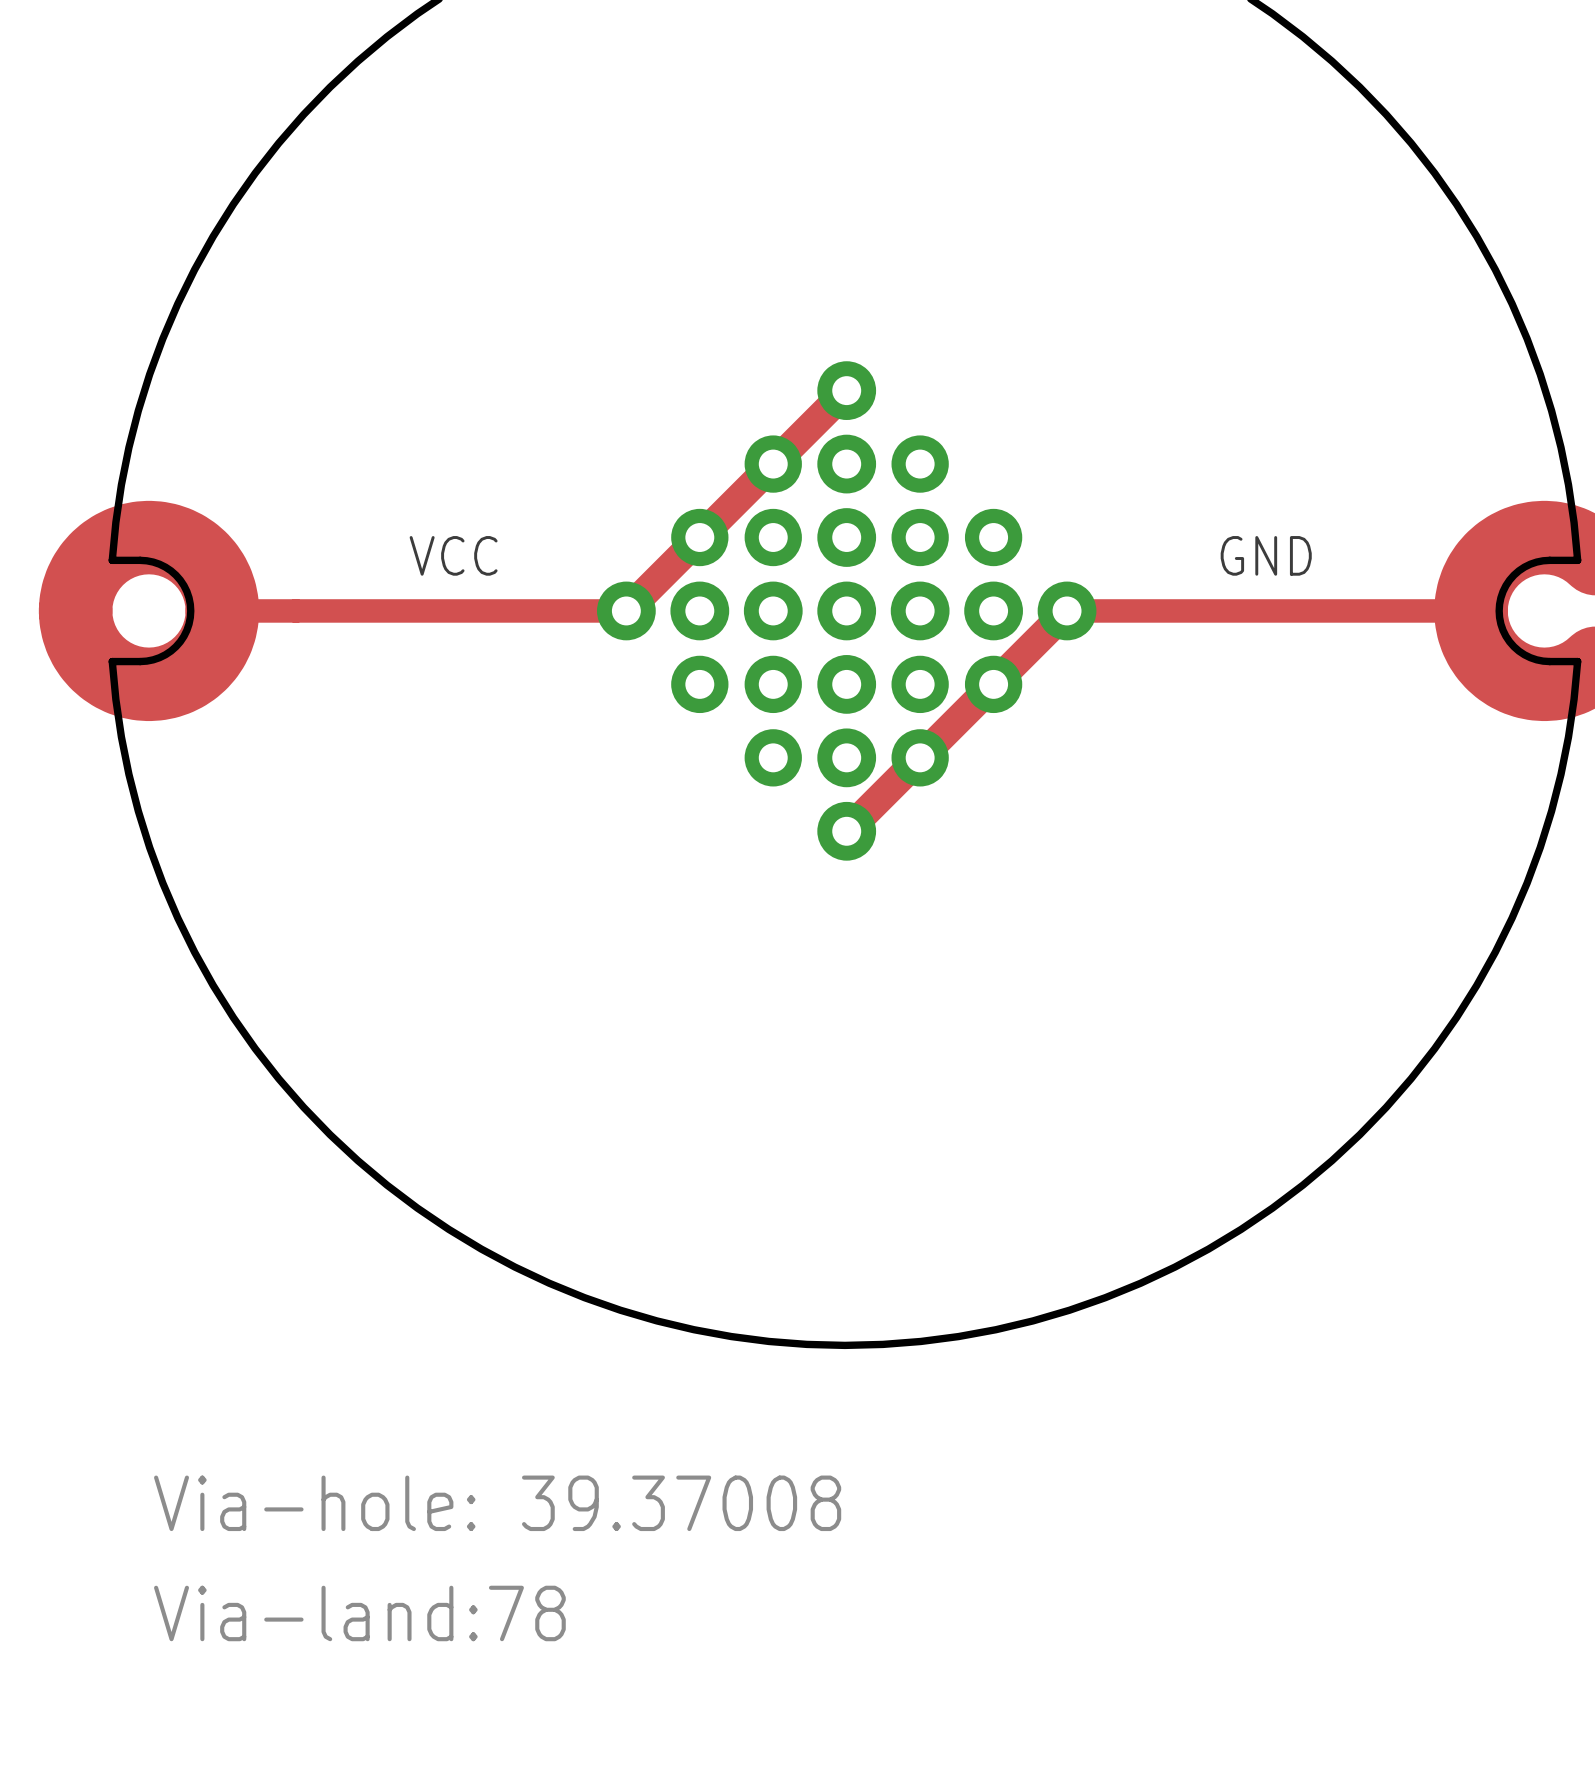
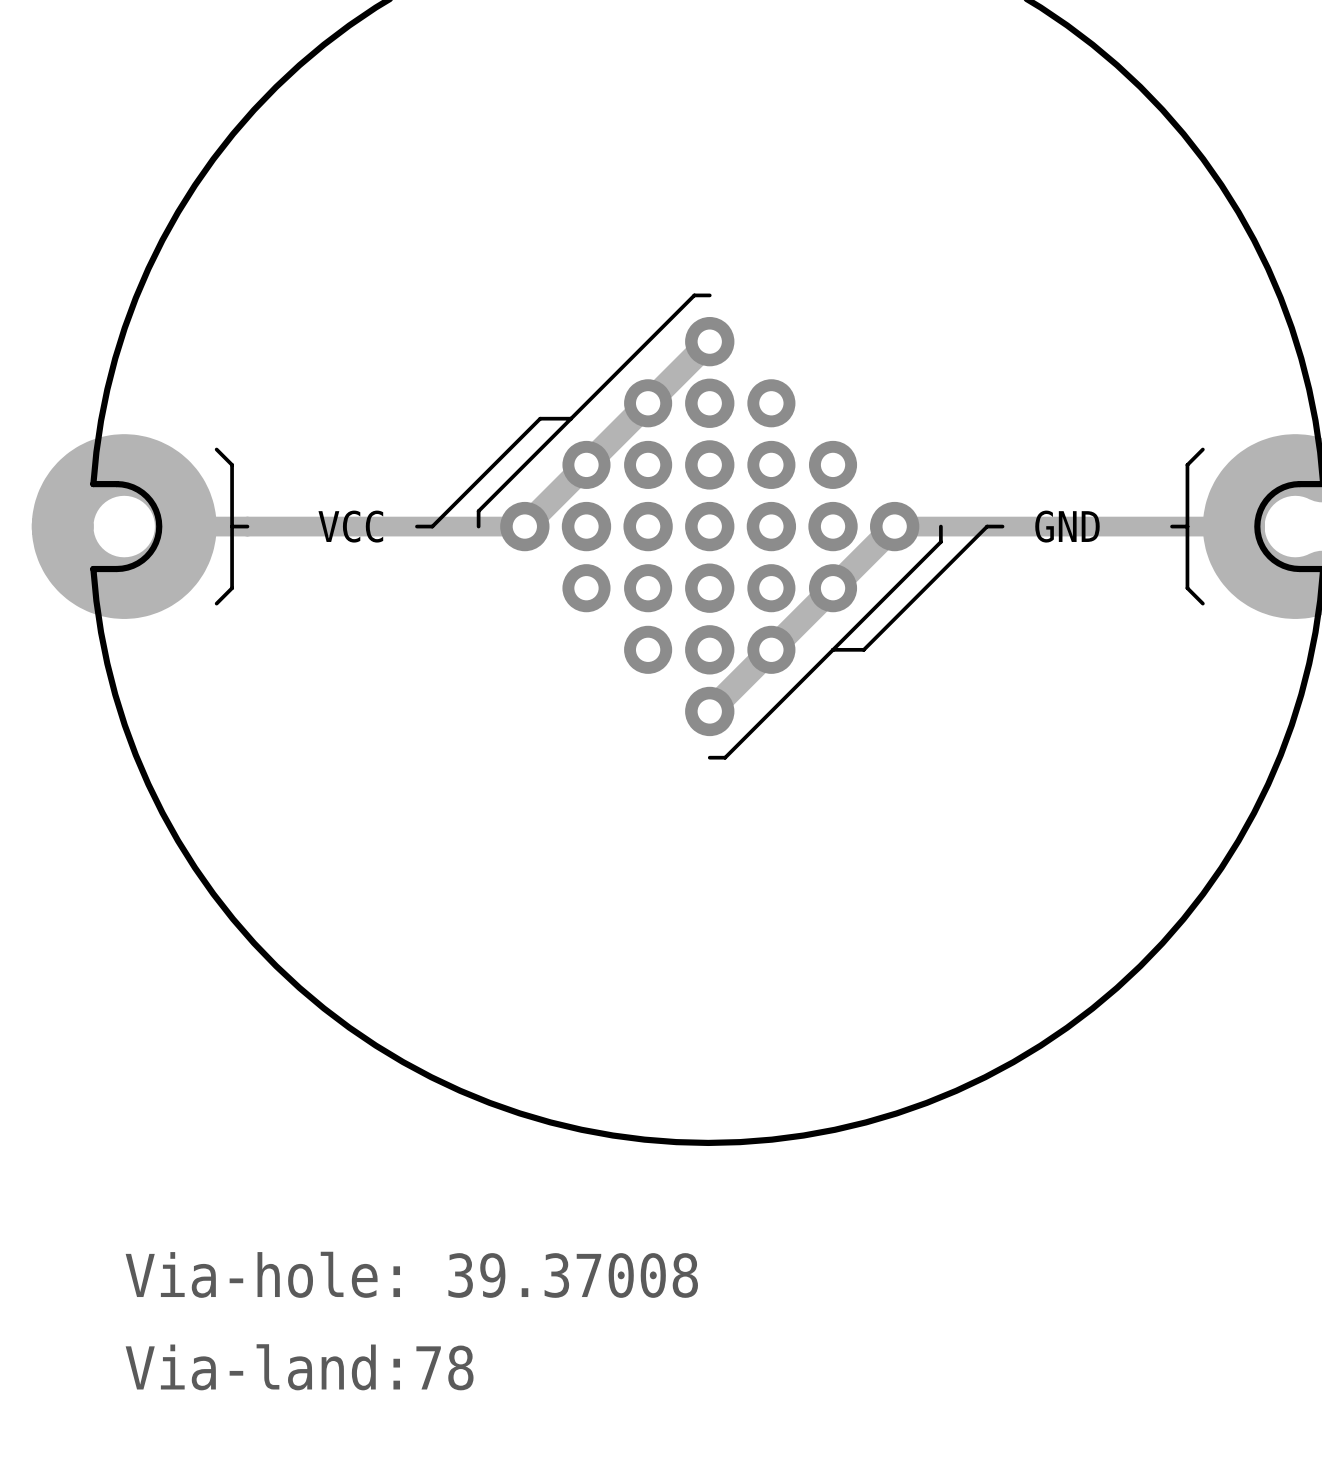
line: none -> (709, 295) (694, 295) (478, 511) (478, 526)
line: none -> (571, 418) (540, 418) (432, 526) (416, 526)
line: none -> (216, 449) (232, 464) (232, 588) (216, 603)
line: none -> (1202, 449) (1187, 464) (1187, 588) (1202, 603)
text position: VCC (453, 555) -> VCC (350, 526)
text position: GND (1266, 555) -> GND (1067, 526)
line: none -> (232, 526) (247, 526)
line: none -> (940, 526) (940, 541) (725, 757) (709, 757)
line: none -> (1002, 526) (987, 526) (863, 649) (833, 649)
line: none -> (1172, 526) (1187, 526)

